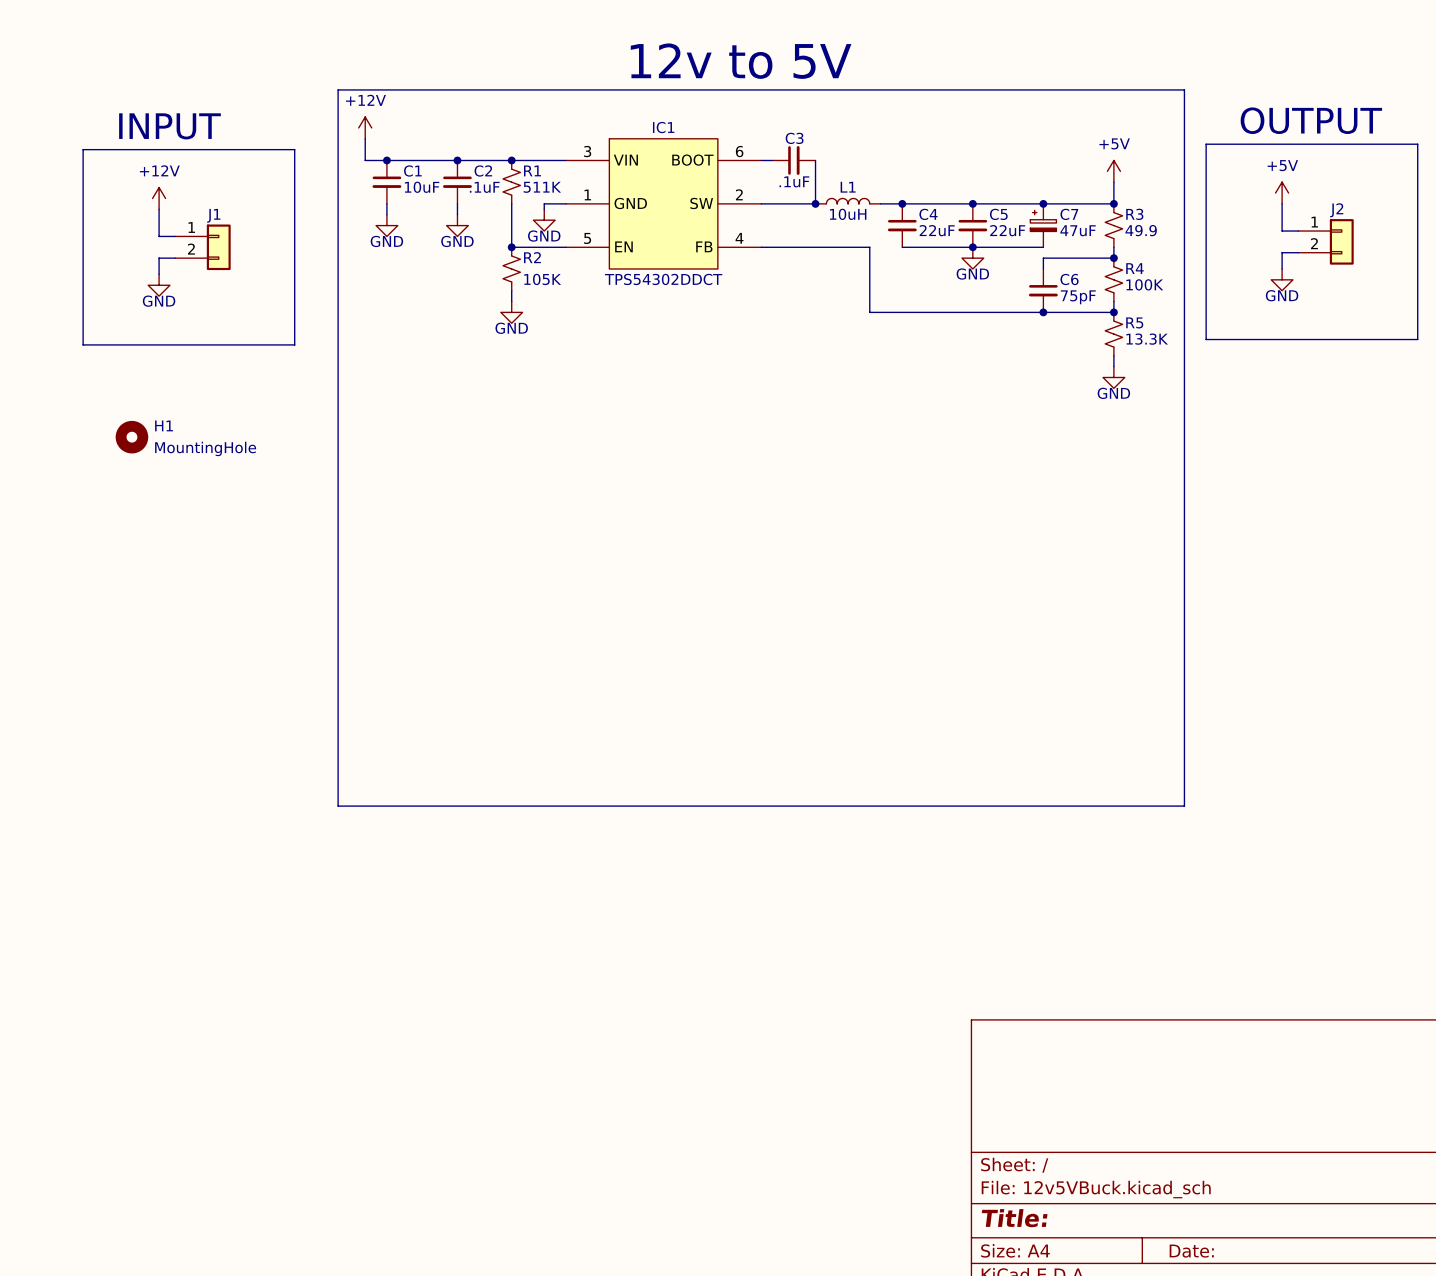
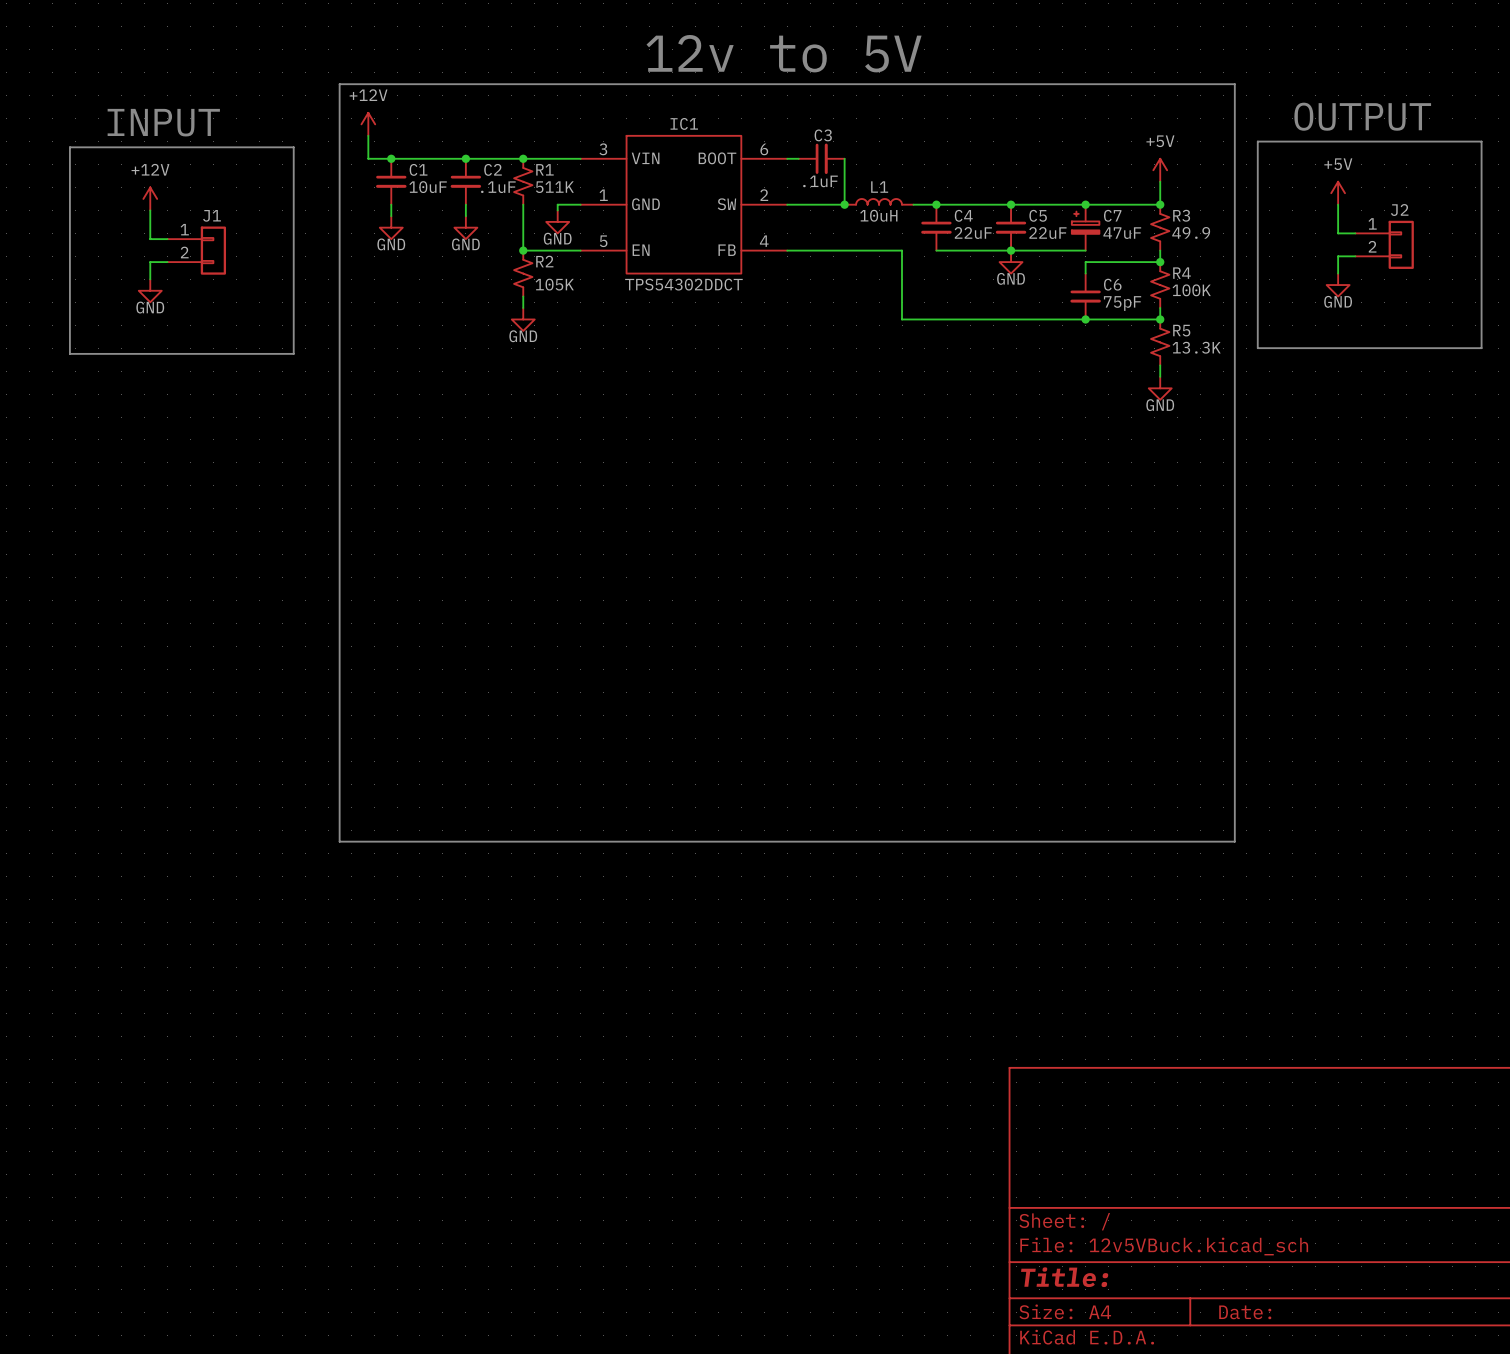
H1: MountingHole (131, 437) -> none

